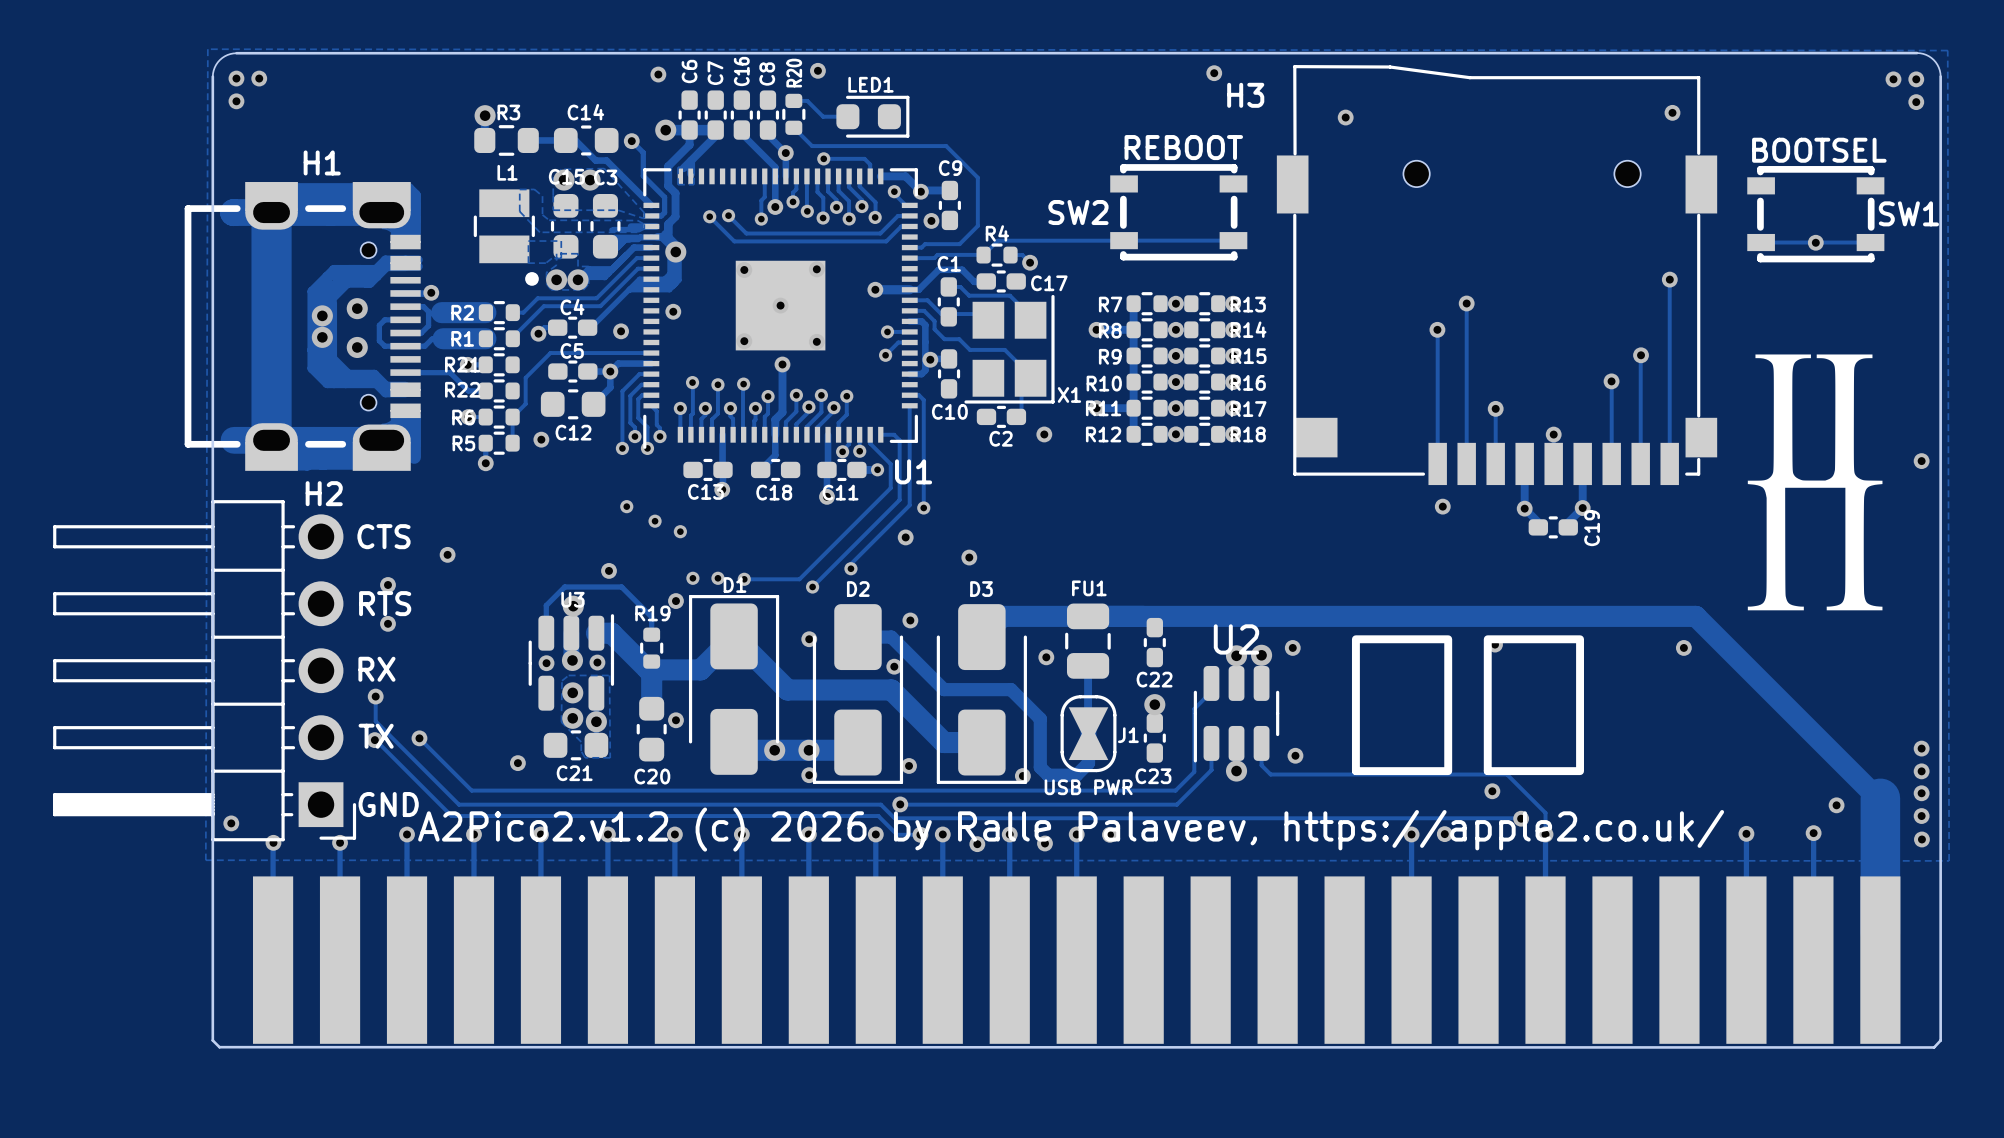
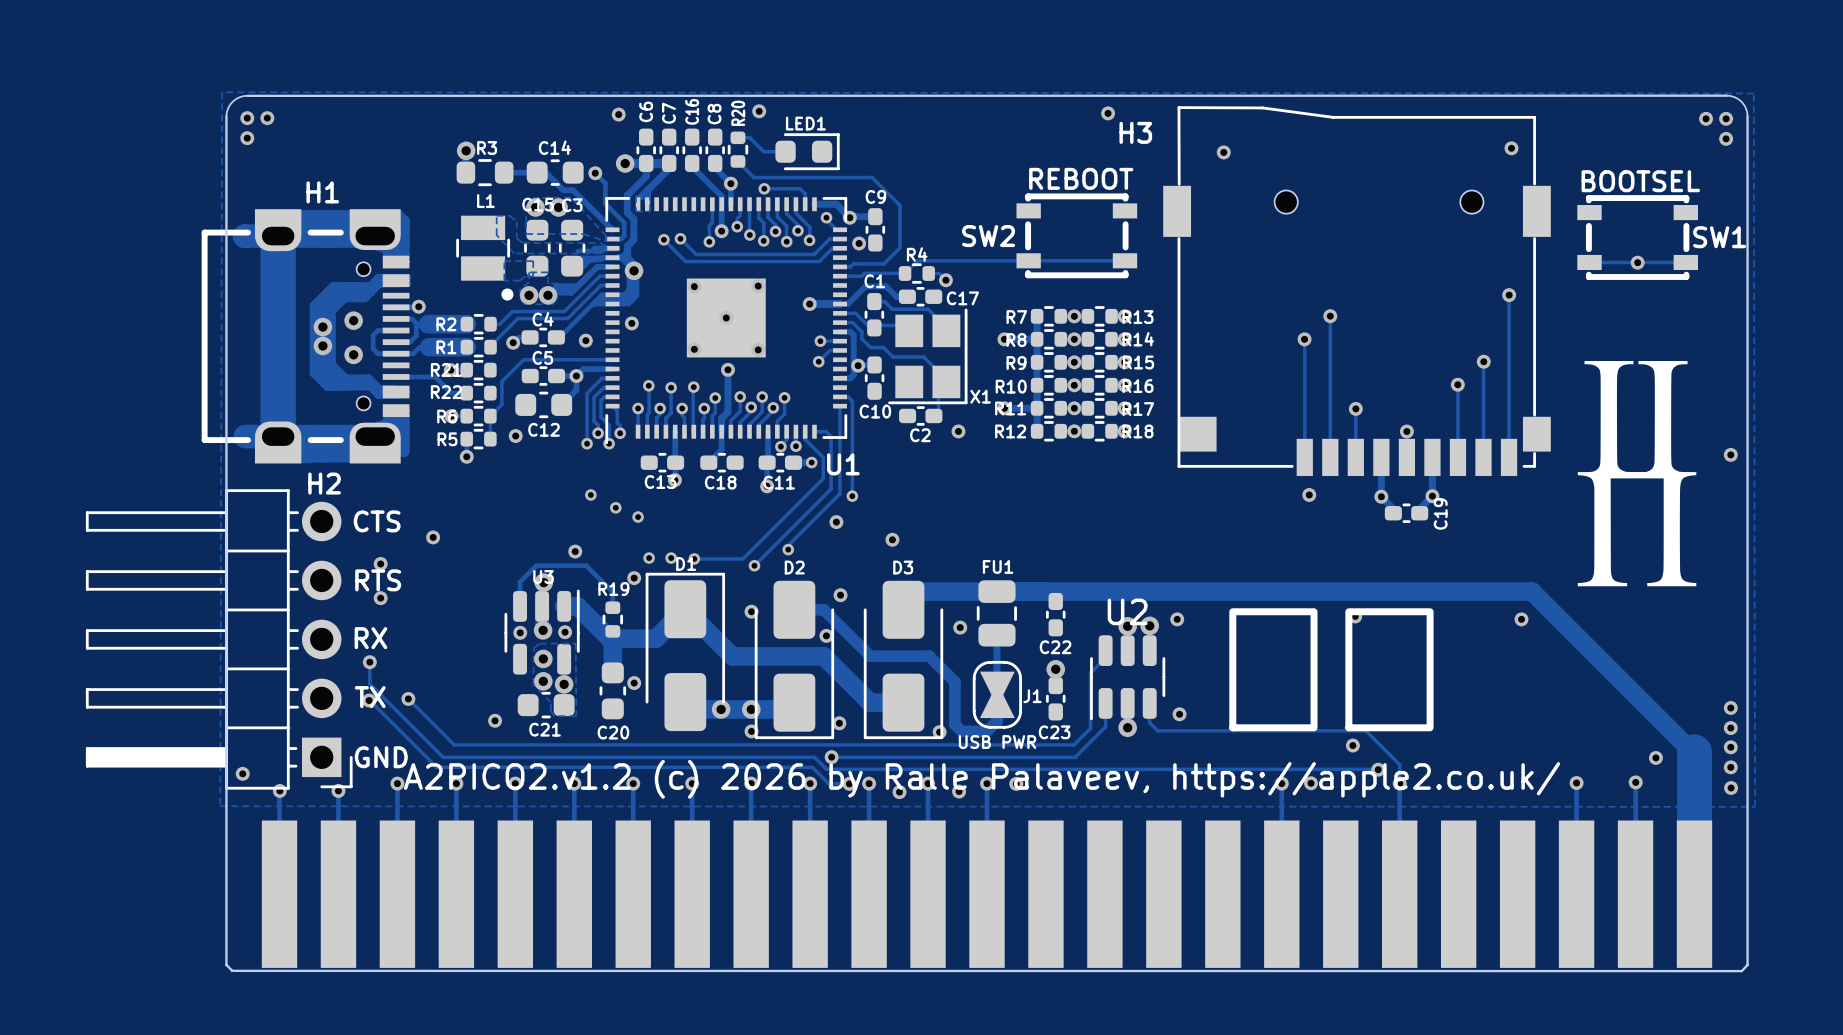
text: A2Pico2.v1.2 (c) 2026 by Ralle Palaveev, https://apple2.co.uk/ (1071, 829) -> A2PICO2.v1.2 (c) 2026 by Ralle Palaveev, https://apple2.co.uk/ (982, 779)

